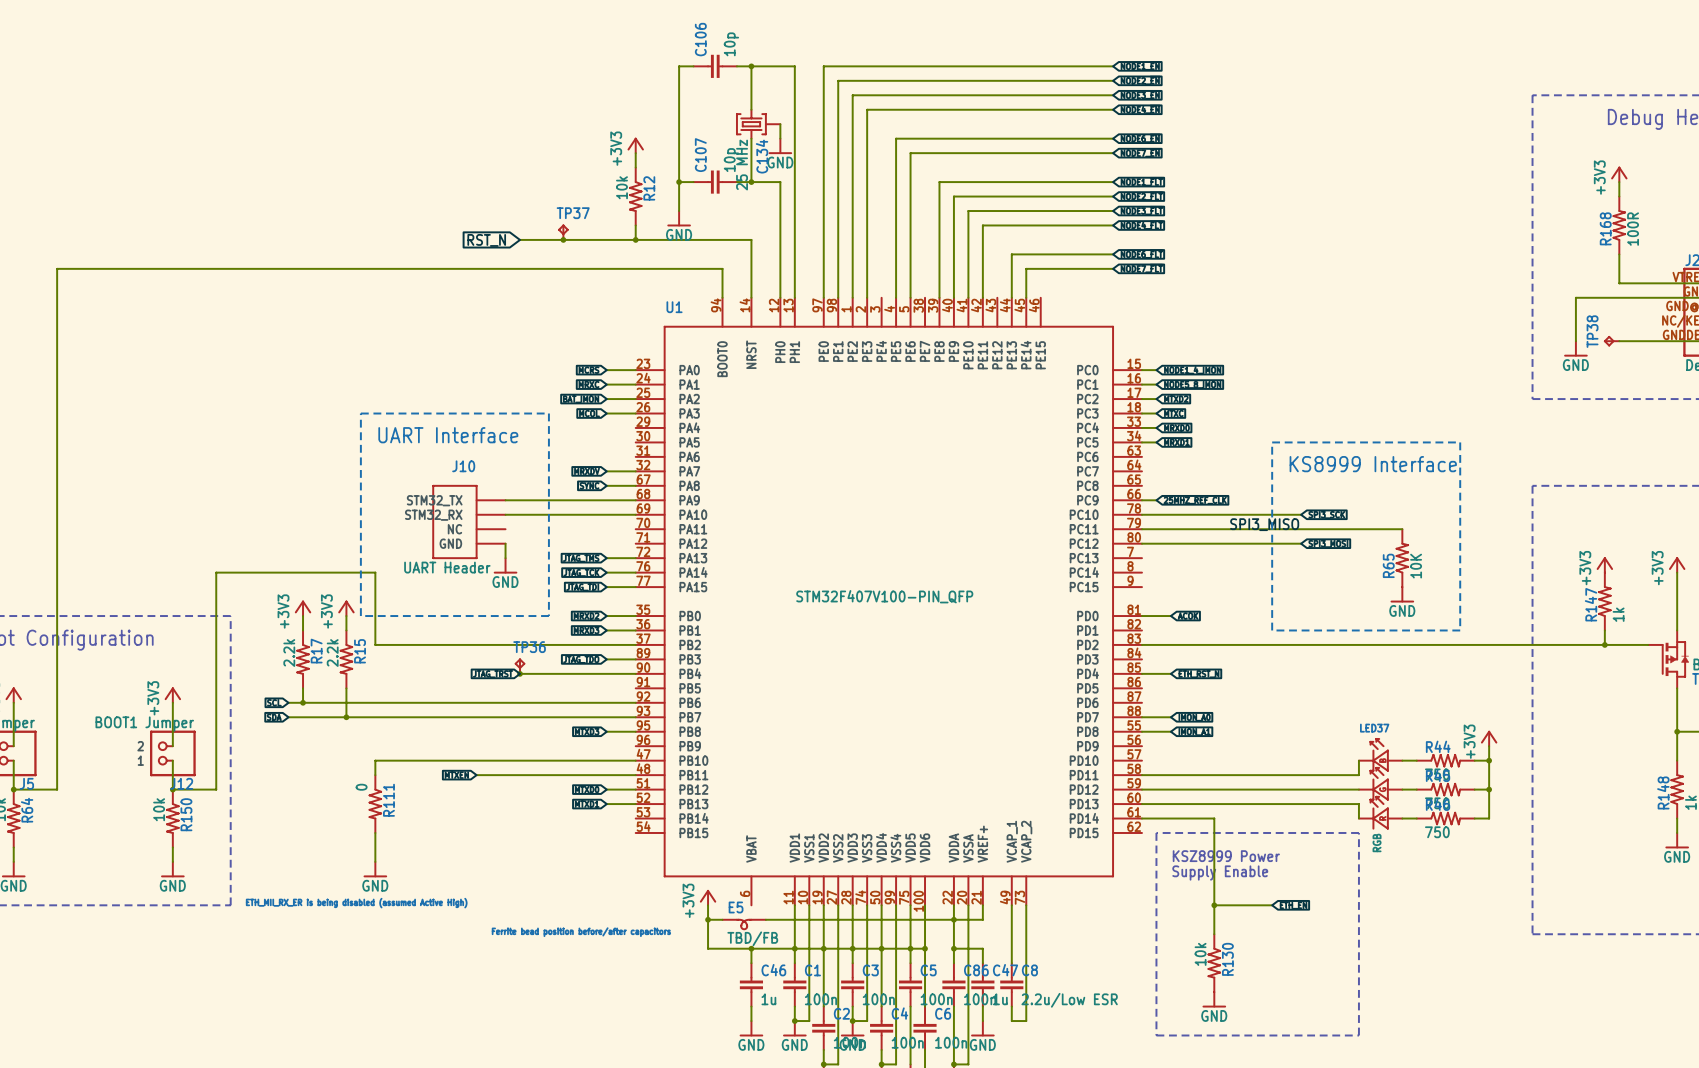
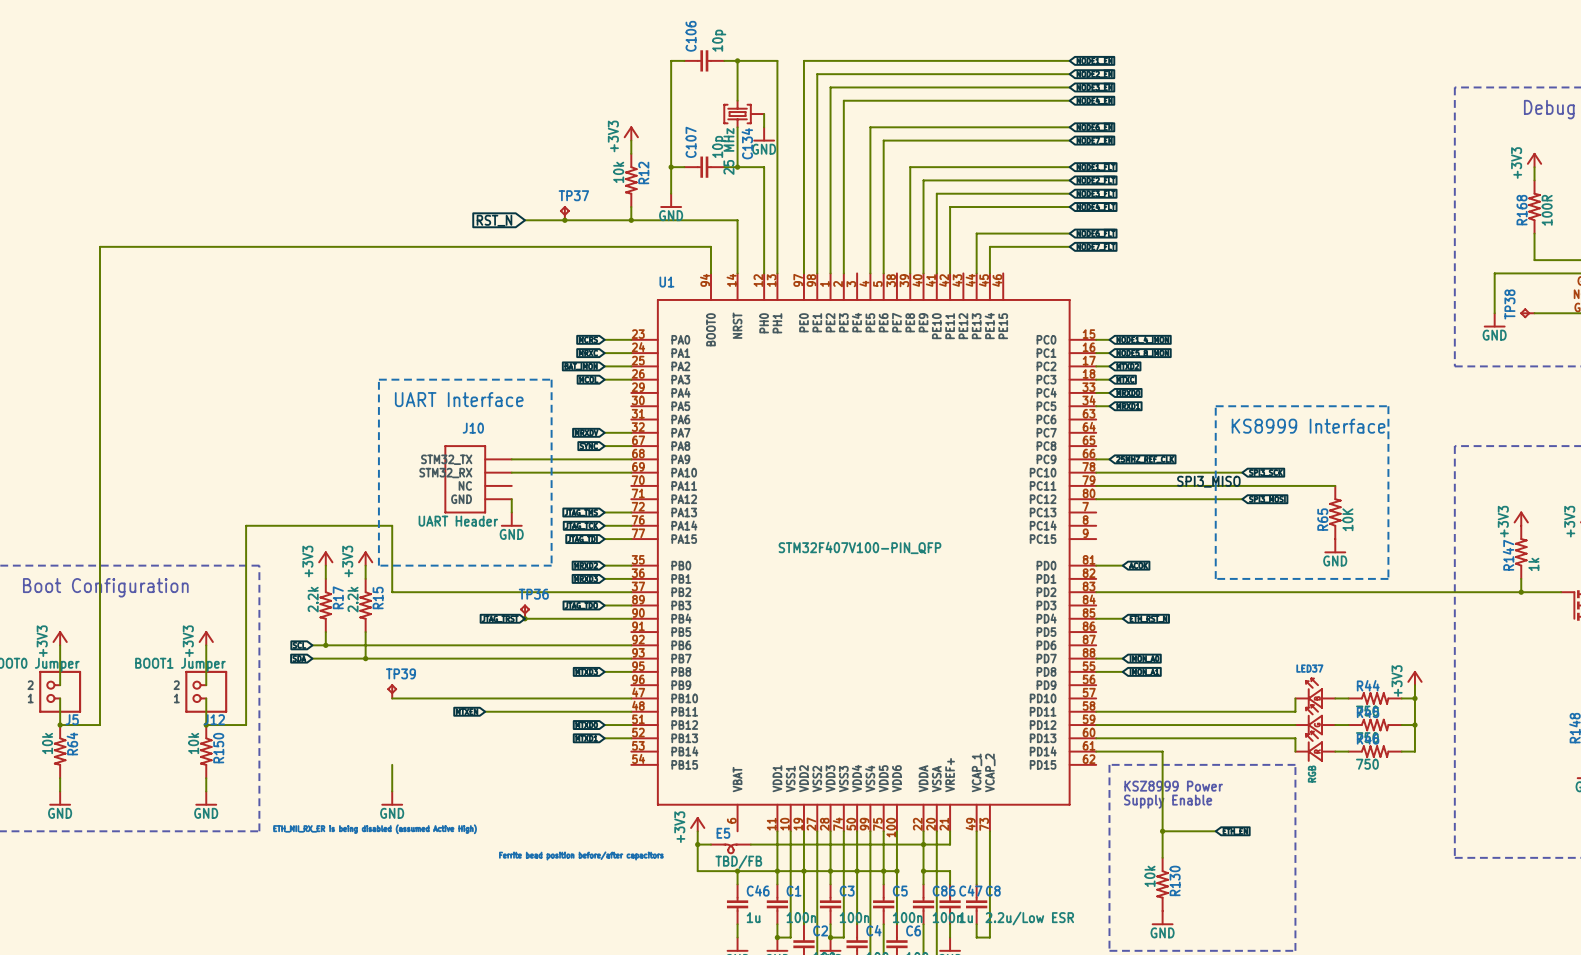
TP39: none -> (392, 691)
wire: (375, 760) (375, 775) -> none
R111: 0 (375, 804) -> none

